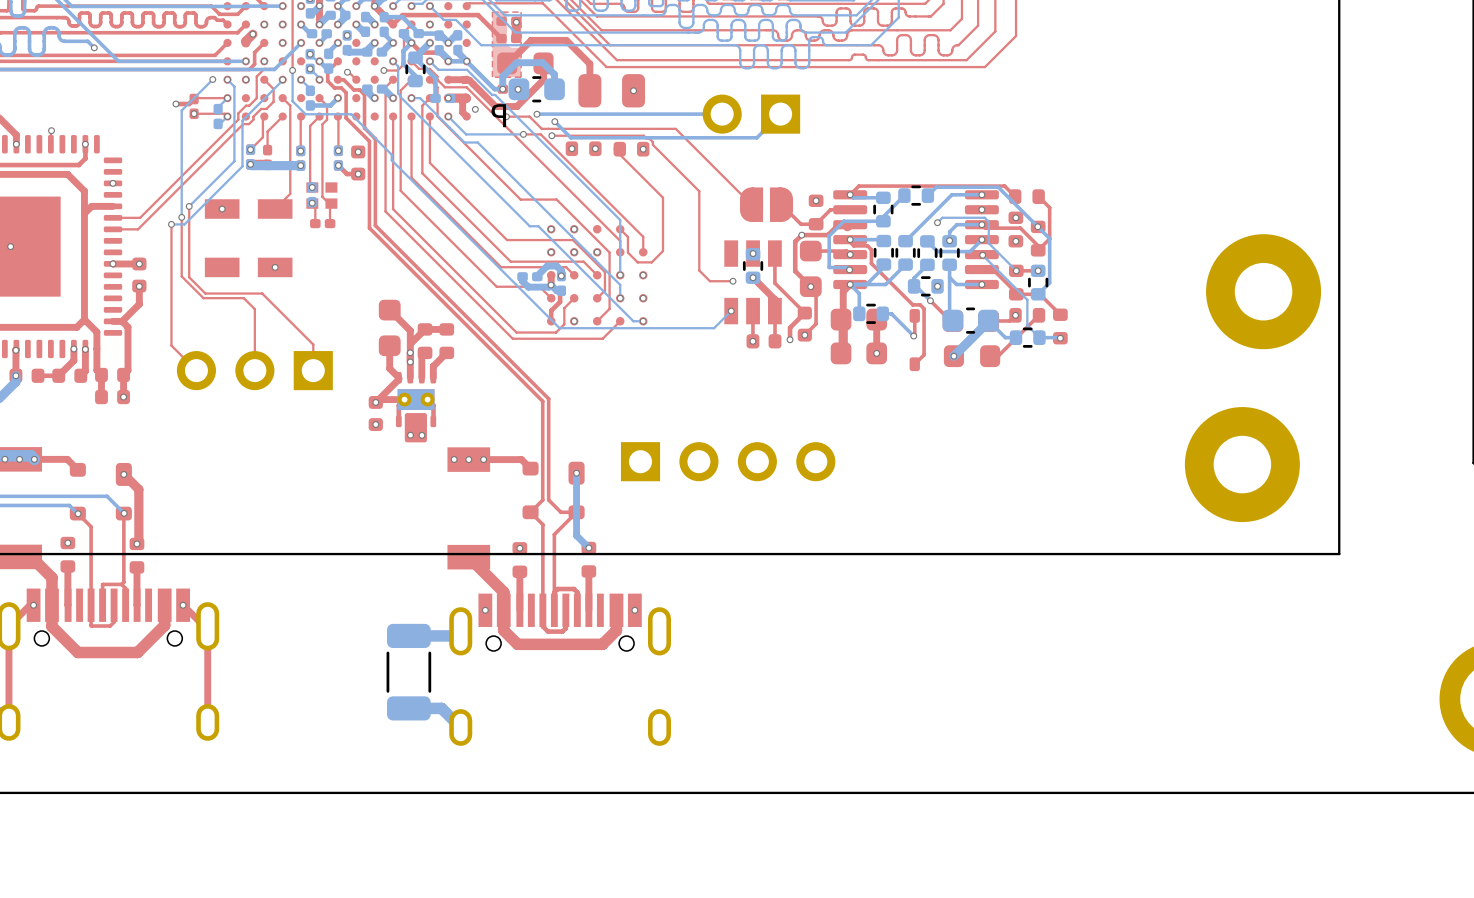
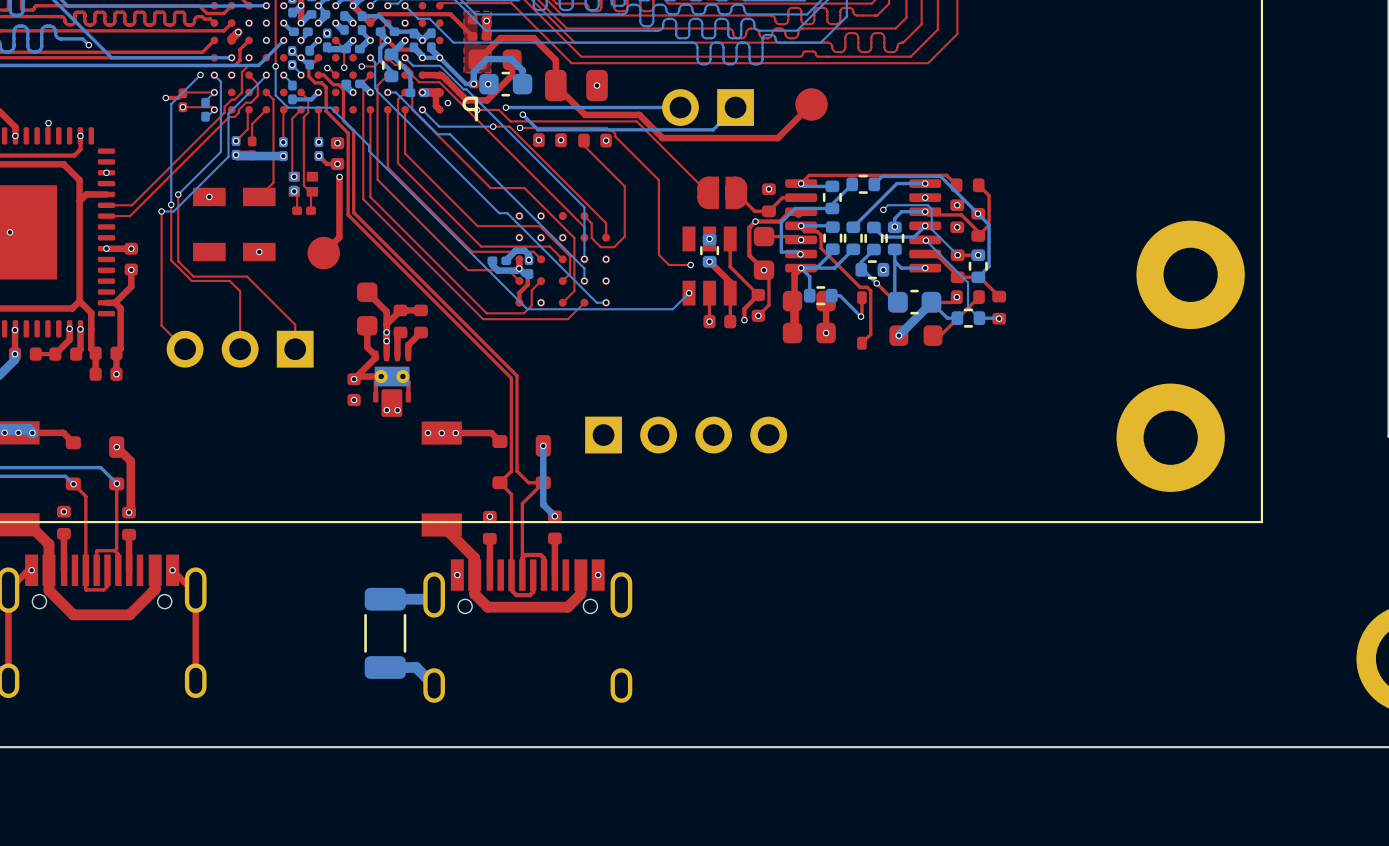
top track: none -> (335, 40) (344, 48) (344, 67)
via: none -> (344, 67)
top track: none -> (555, 85) (585, 114) (639, 114) (662, 138) (777, 138) (811, 104)
part: none -> (811, 104)
via: none -> (339, 177)
top track: none -> (339, 177) (339, 237) (323, 253)
part: none -> (323, 253)

